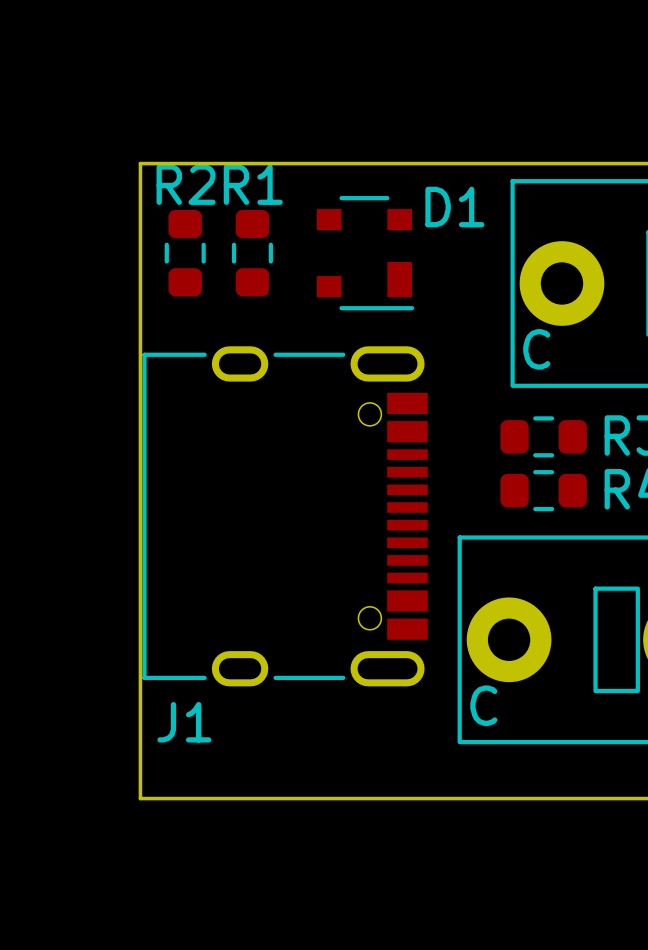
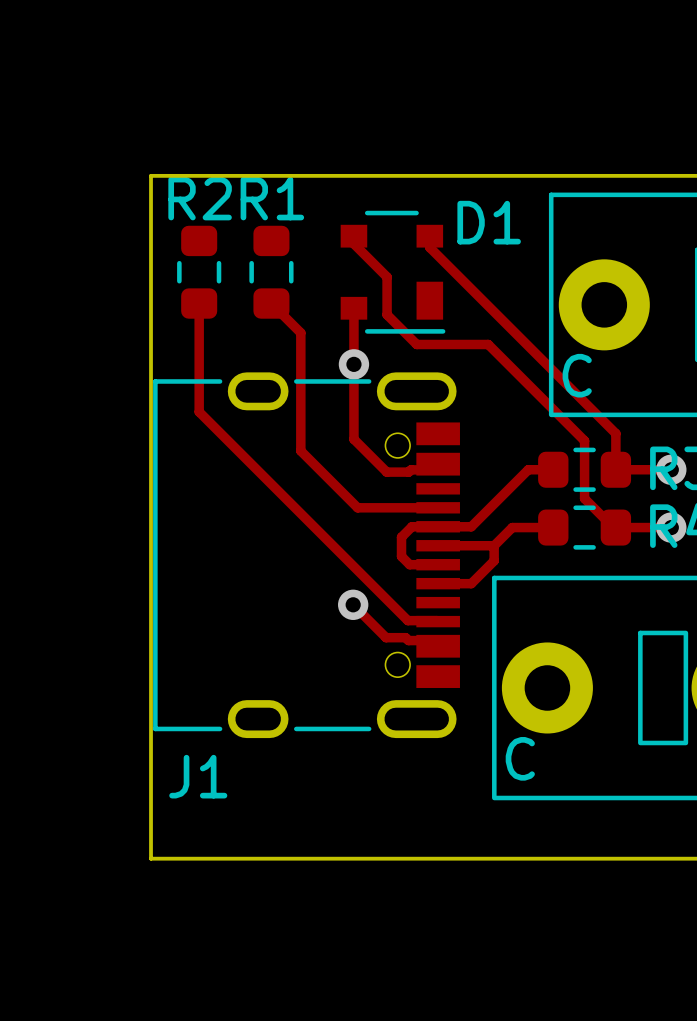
track: none -> (353, 236) (353, 243) (387, 277) (387, 314) (416, 344) (488, 344) (584, 440) (584, 498) (613, 527) (671, 527)
track: none -> (429, 236) (429, 247) (615, 433) (615, 469) (671, 469)
track: none -> (199, 303) (199, 411) (407, 620) (438, 621)
track: none -> (271, 303) (300, 332) (300, 450) (357, 507) (438, 507)
track: none -> (353, 308) (353, 439) (386, 472) (438, 469) (438, 458)
via: none -> (353, 364)
track: none -> (553, 469) (528, 469) (471, 526) (411, 526) (401, 537) (401, 556) (409, 564) (438, 564)
via: none -> (671, 469)
track: none -> (553, 527) (512, 527) (494, 545)
via: none -> (671, 527)
track: none -> (438, 545) (494, 545)
track: none -> (494, 545) (494, 560) (471, 583) (438, 583)
track: none -> (353, 604) (386, 637) (405, 637) (408, 640) (438, 640) (438, 651)
via: none -> (353, 604)

